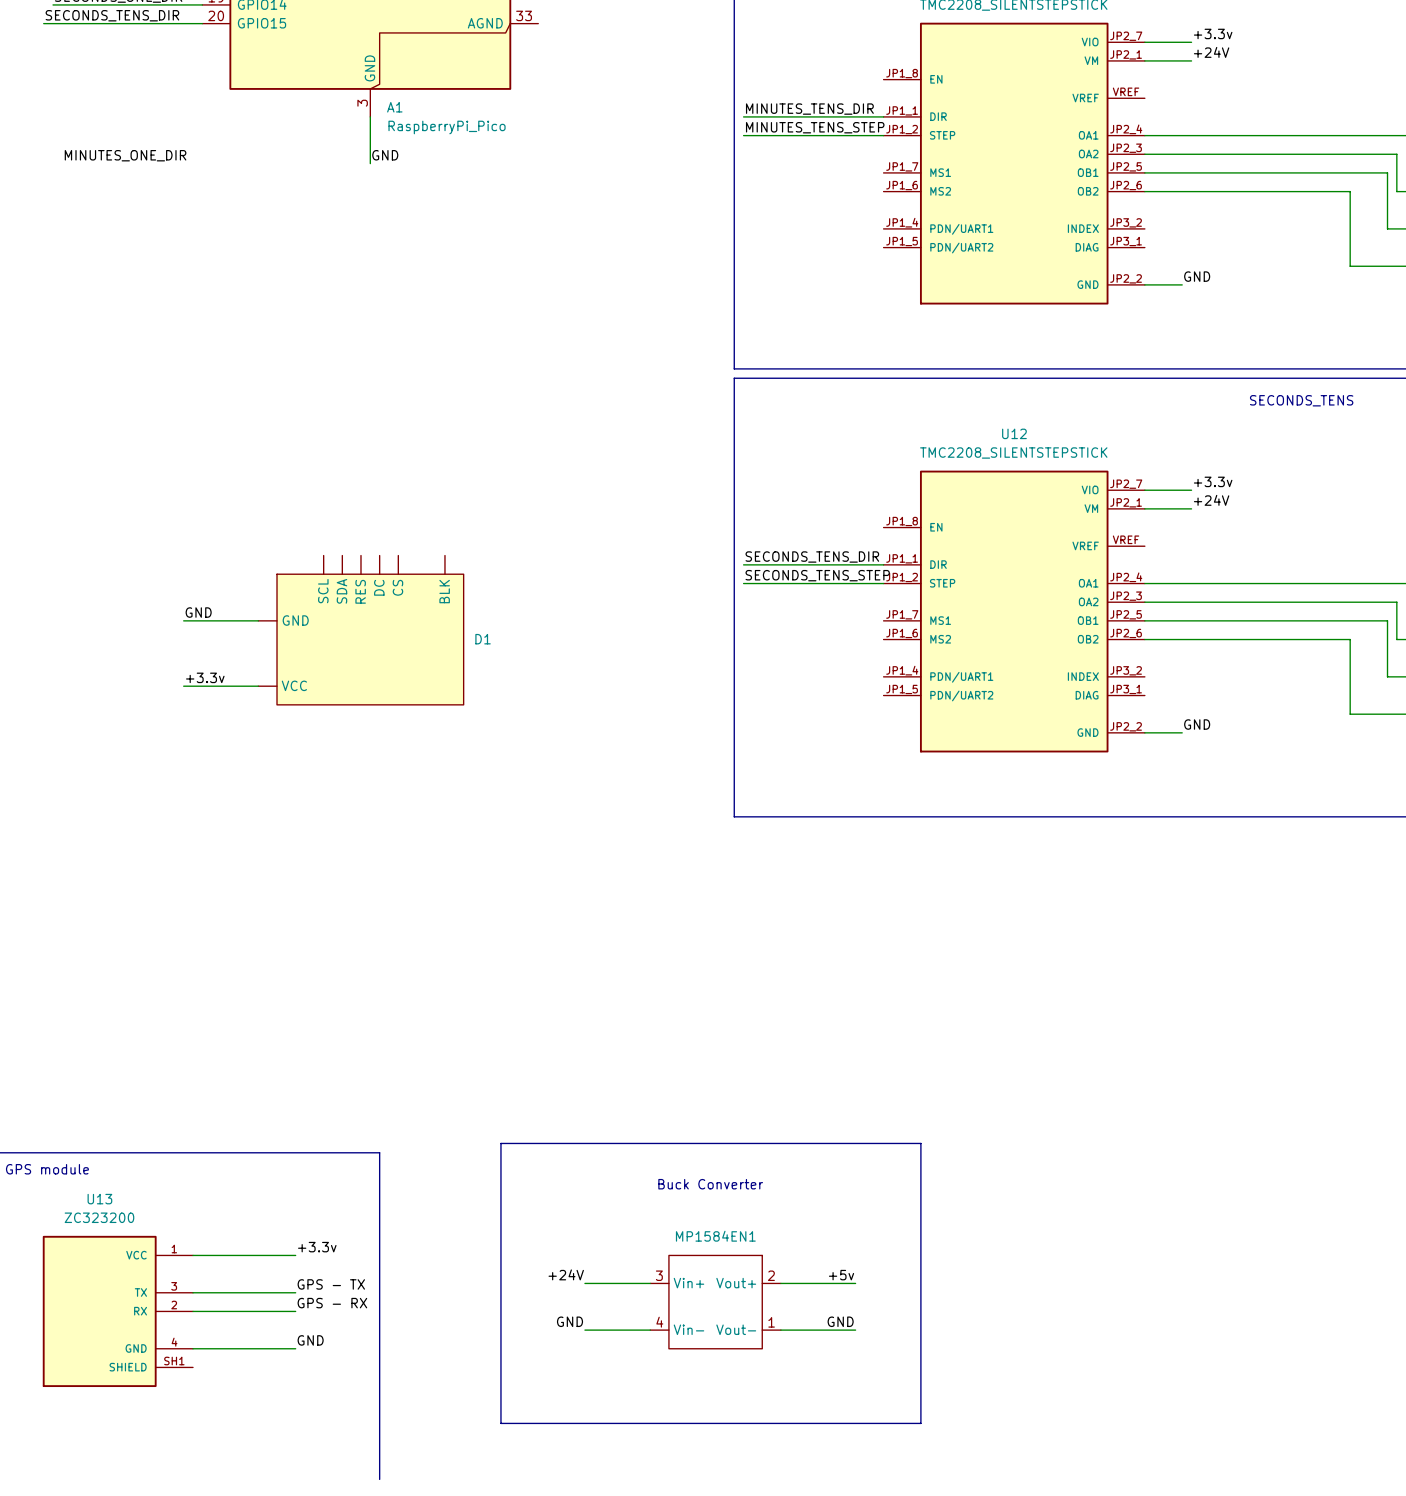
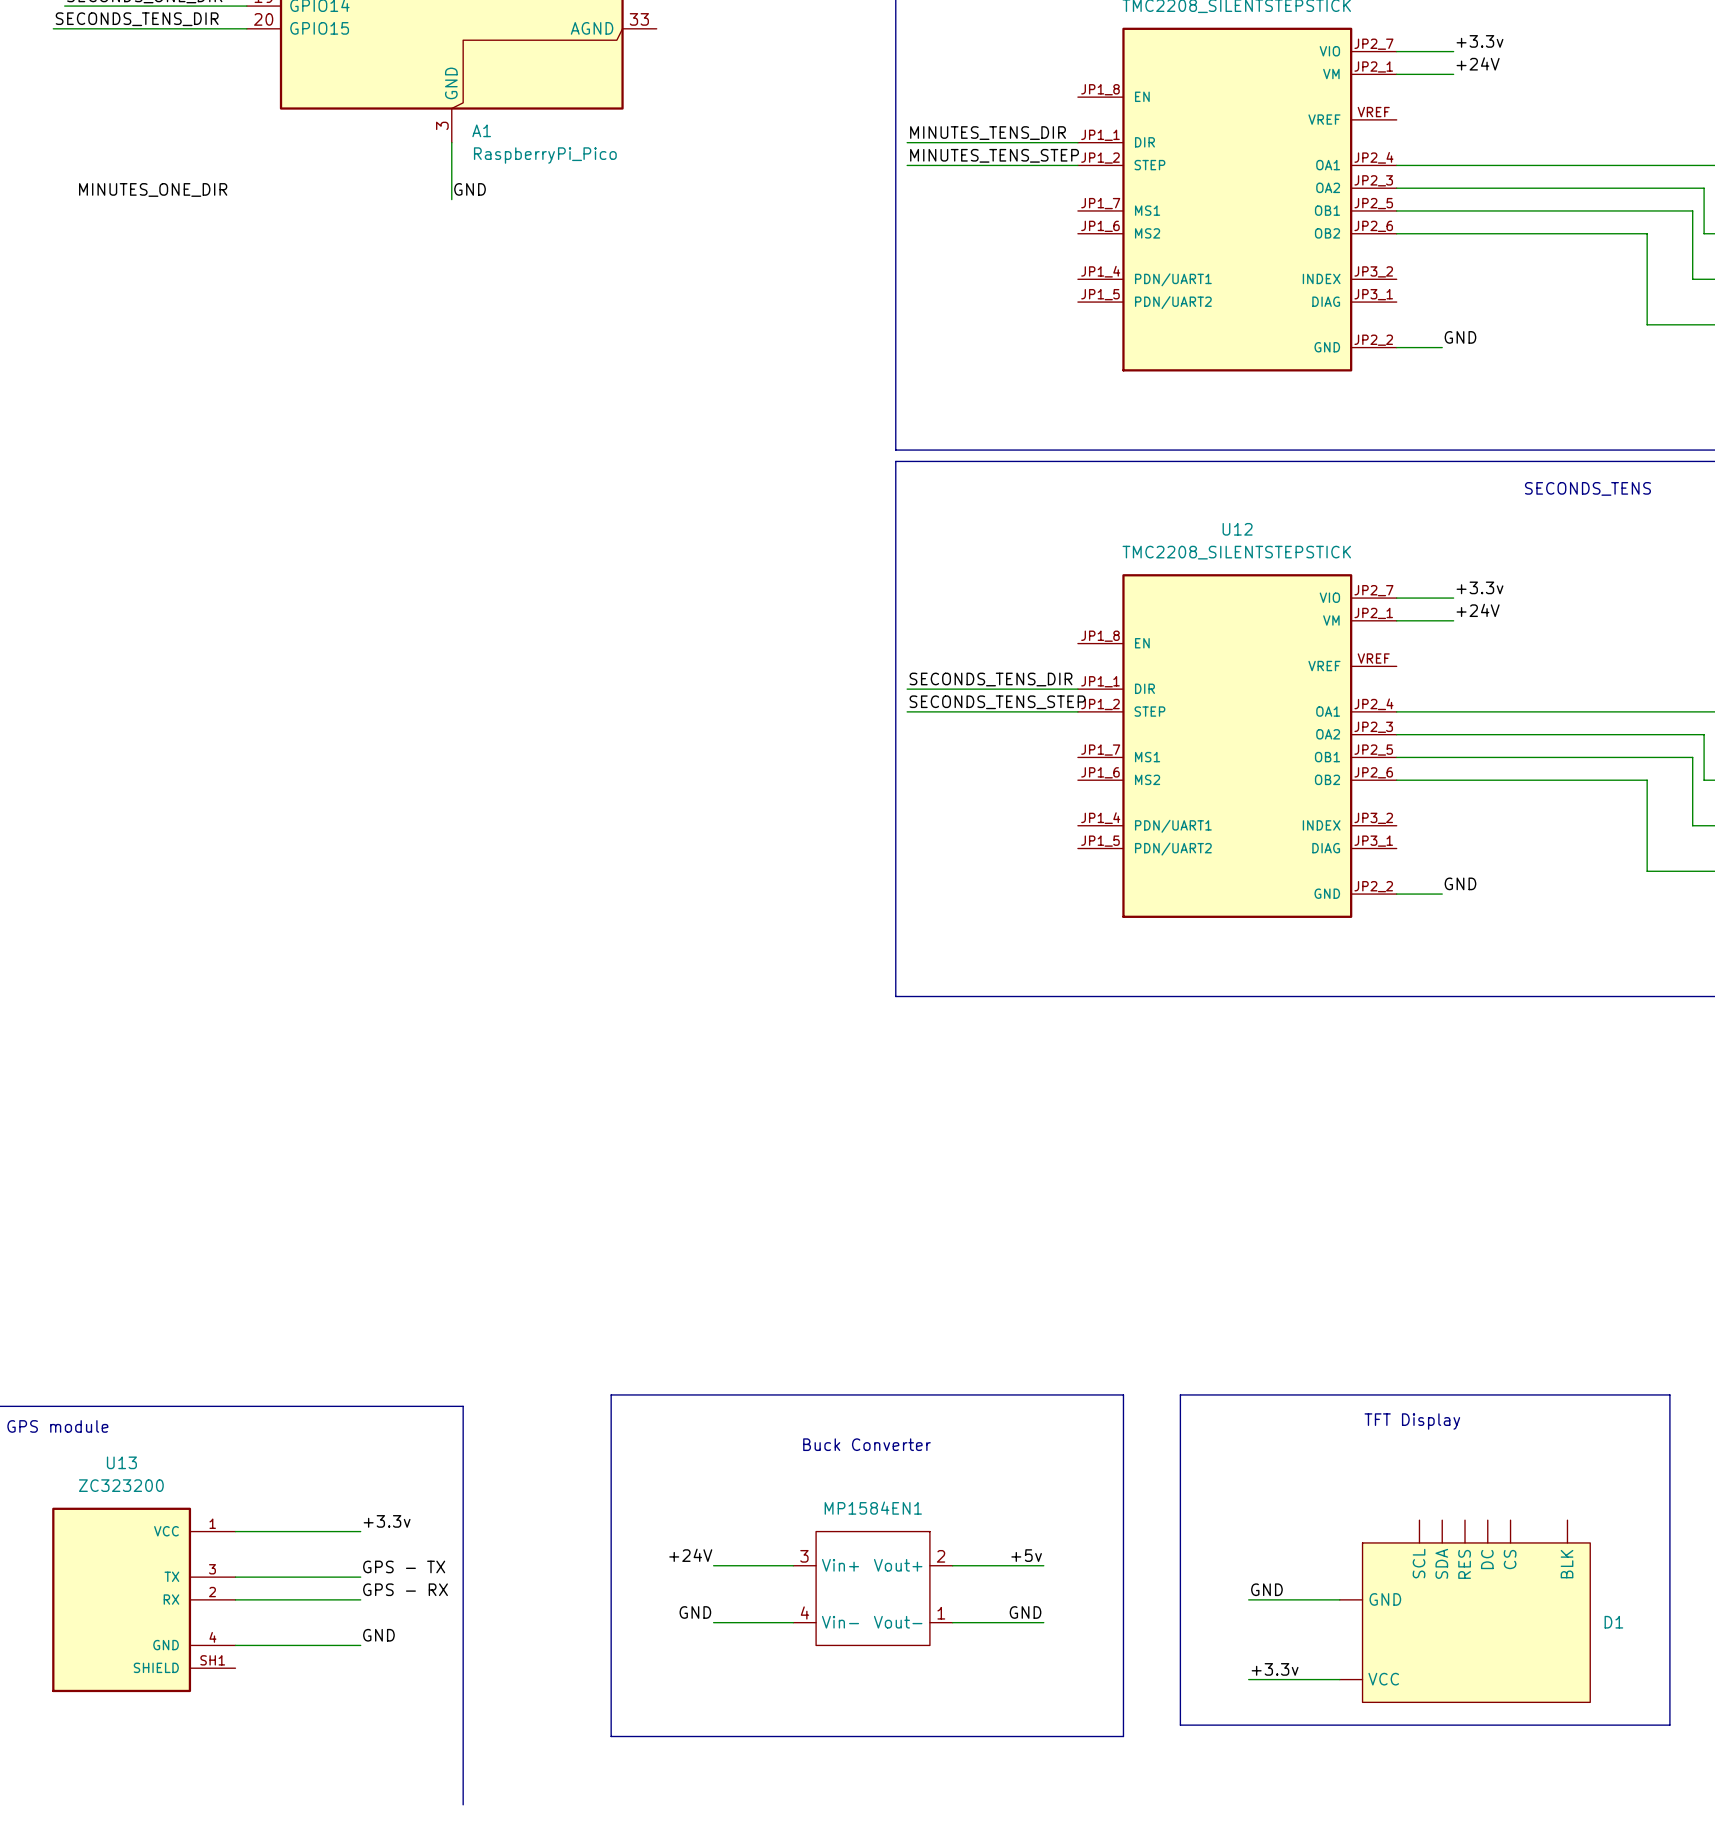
label: GND (198, 612) -> none
wire: (183, 620) (258, 620) -> none
D1 position: (360, 630) -> (1465, 1611)
label: +3.3v (205, 677) -> none
wire: (183, 686) (258, 686) -> none
line: none -> (1180, 1394) (1669, 1394) (1669, 1725) (1180, 1725) (1180, 1394)
text: none -> TFT Display (1412, 1421)
label: none -> GND (1266, 1589)
wire: none -> (1248, 1599) (1339, 1599)
label: none -> +3.3v (1275, 1669)
wire: none -> (1248, 1679) (1339, 1679)

